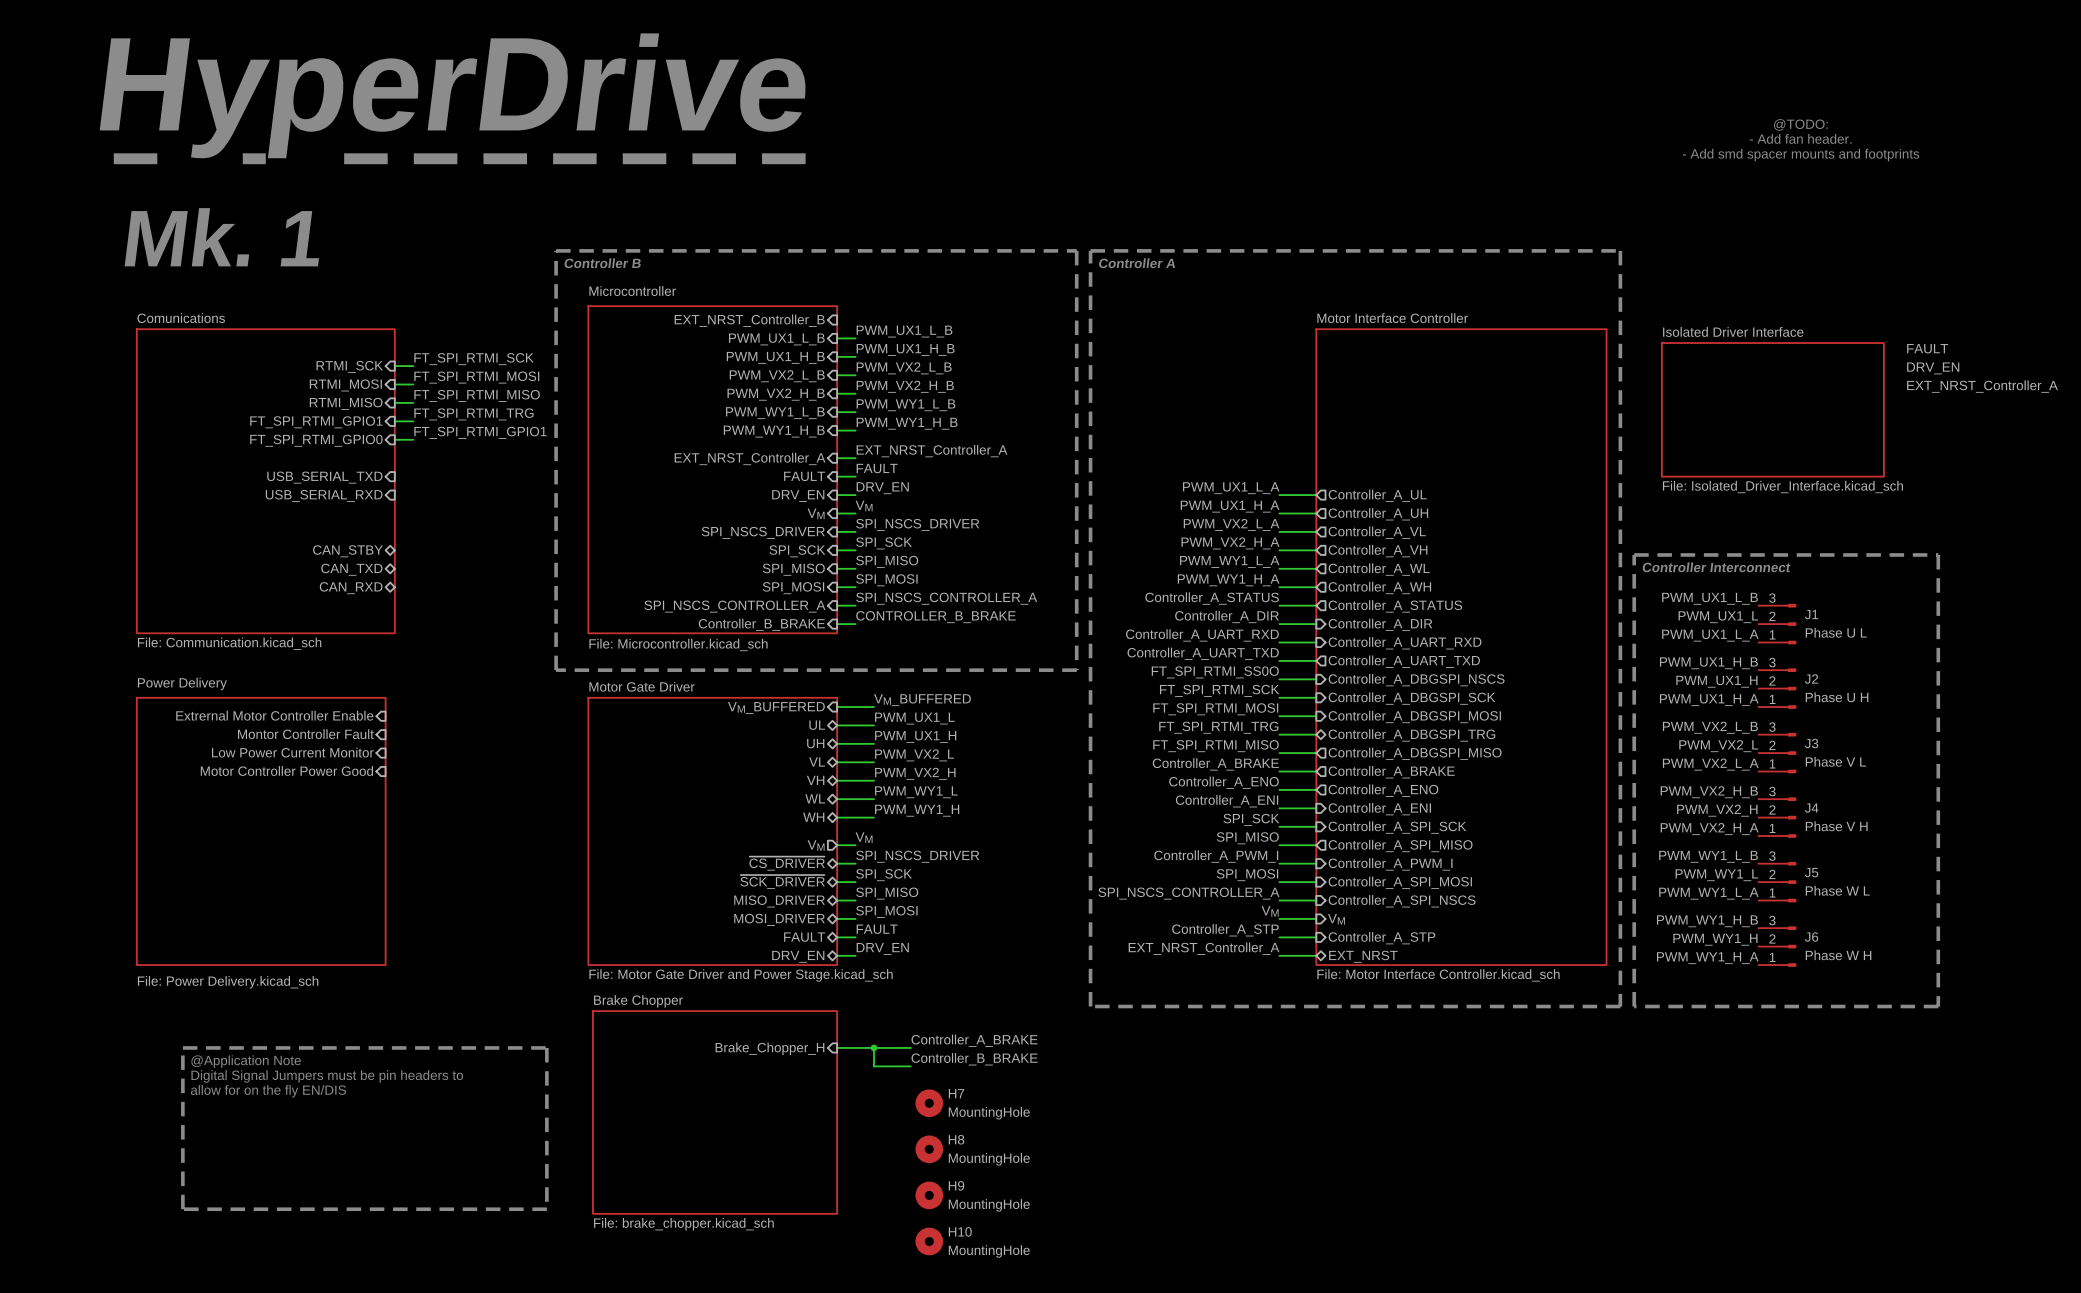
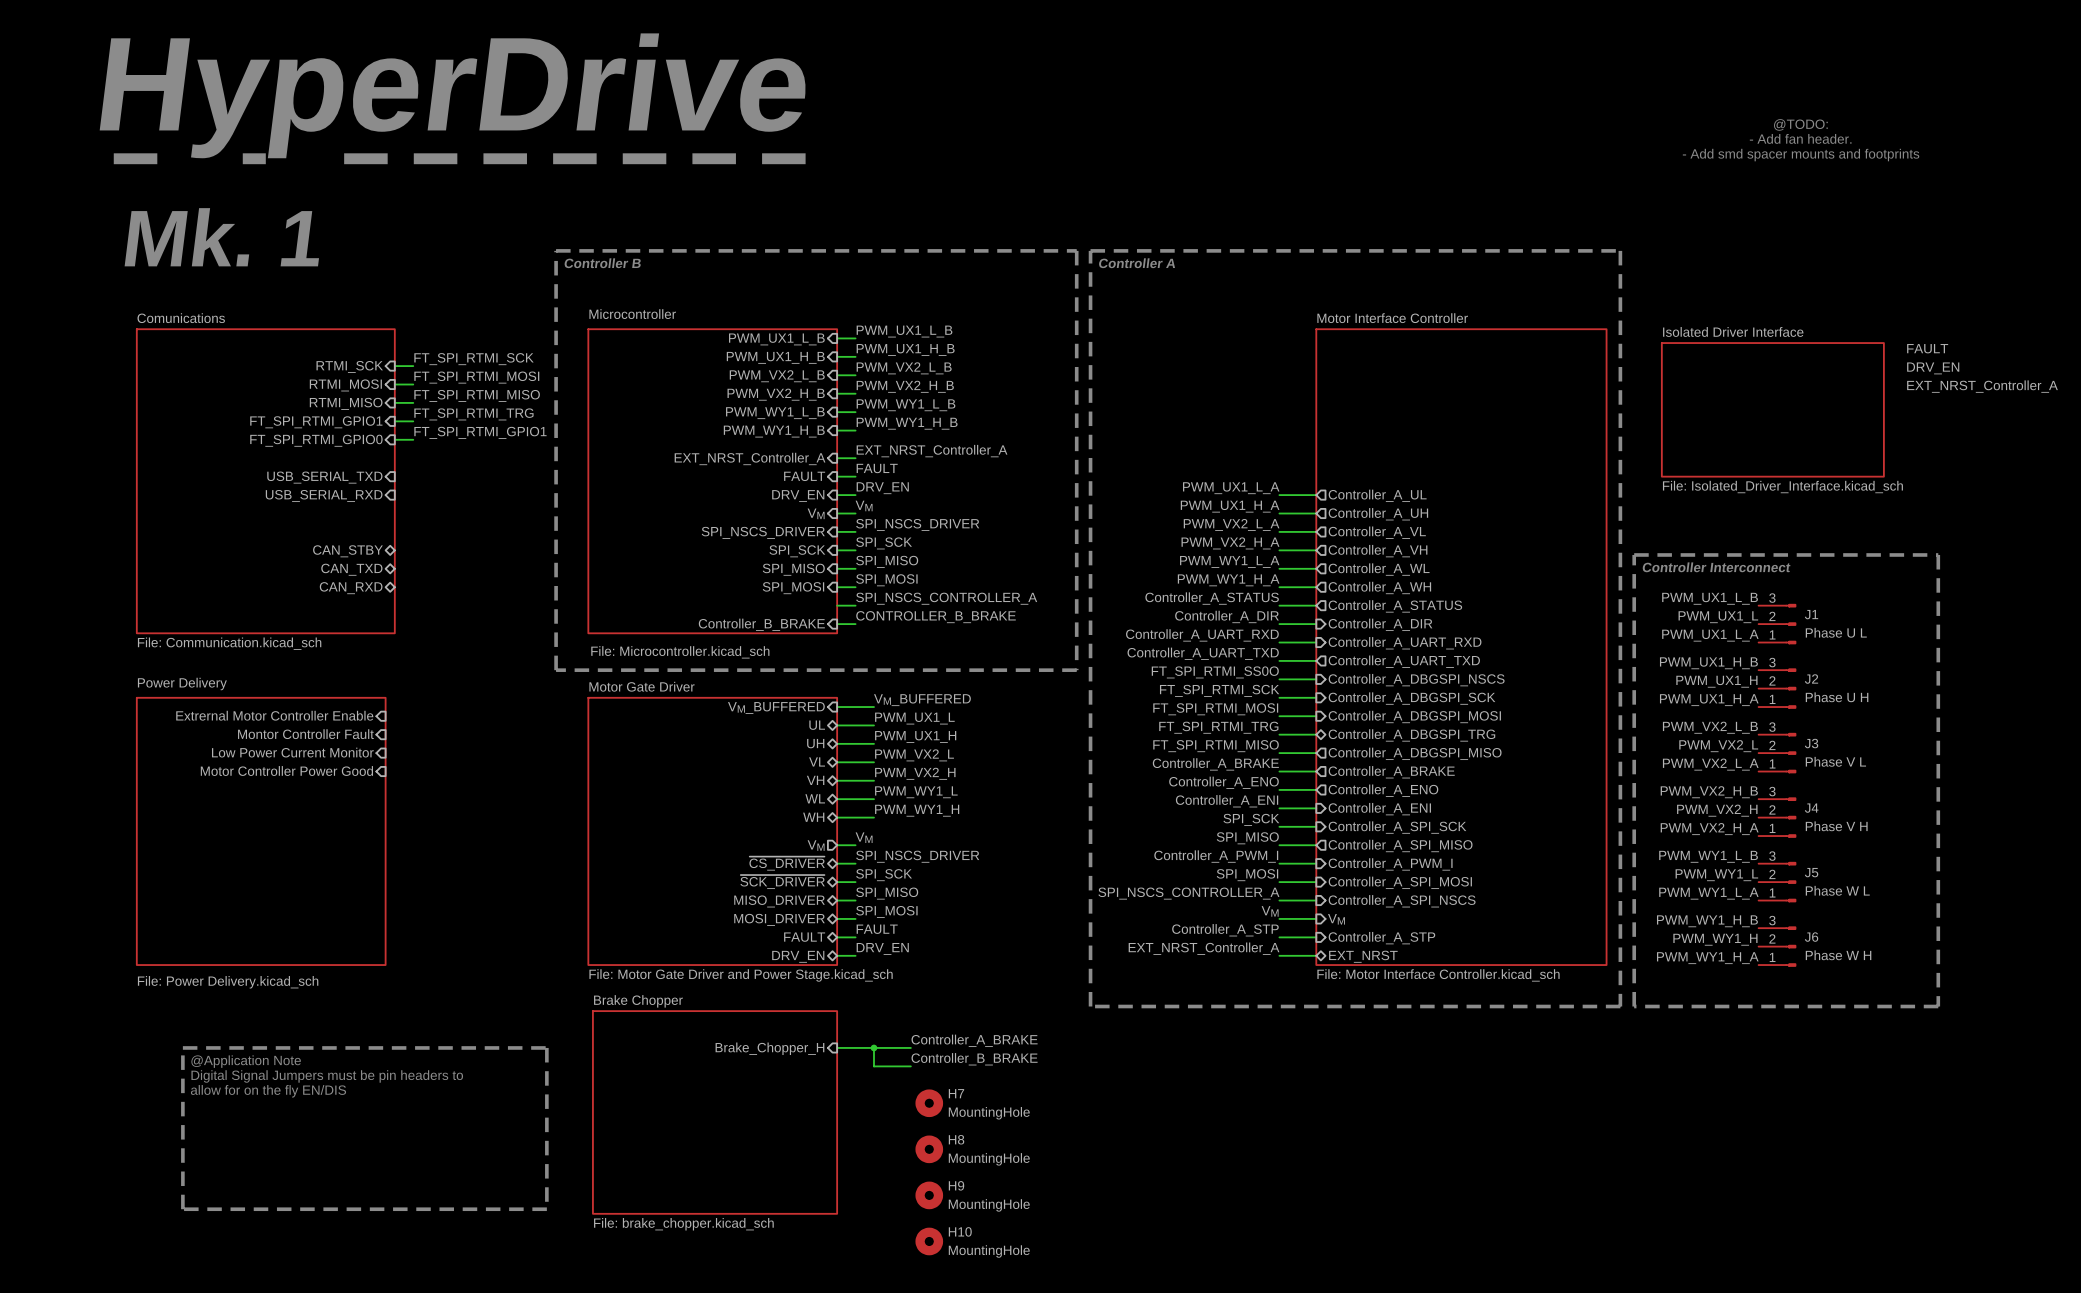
sheet pin: EXT_NRST_Controller_B (749, 320) -> none
sheet Microcontroller: File: Microcontroller.kicad_sch (712, 469) -> none
sheet Microcontroller: none -> File: Microcontroller.kicad_sch (712, 481)
sheet pin: SPI_NSCS_CONTROLLER_A (734, 606) -> none

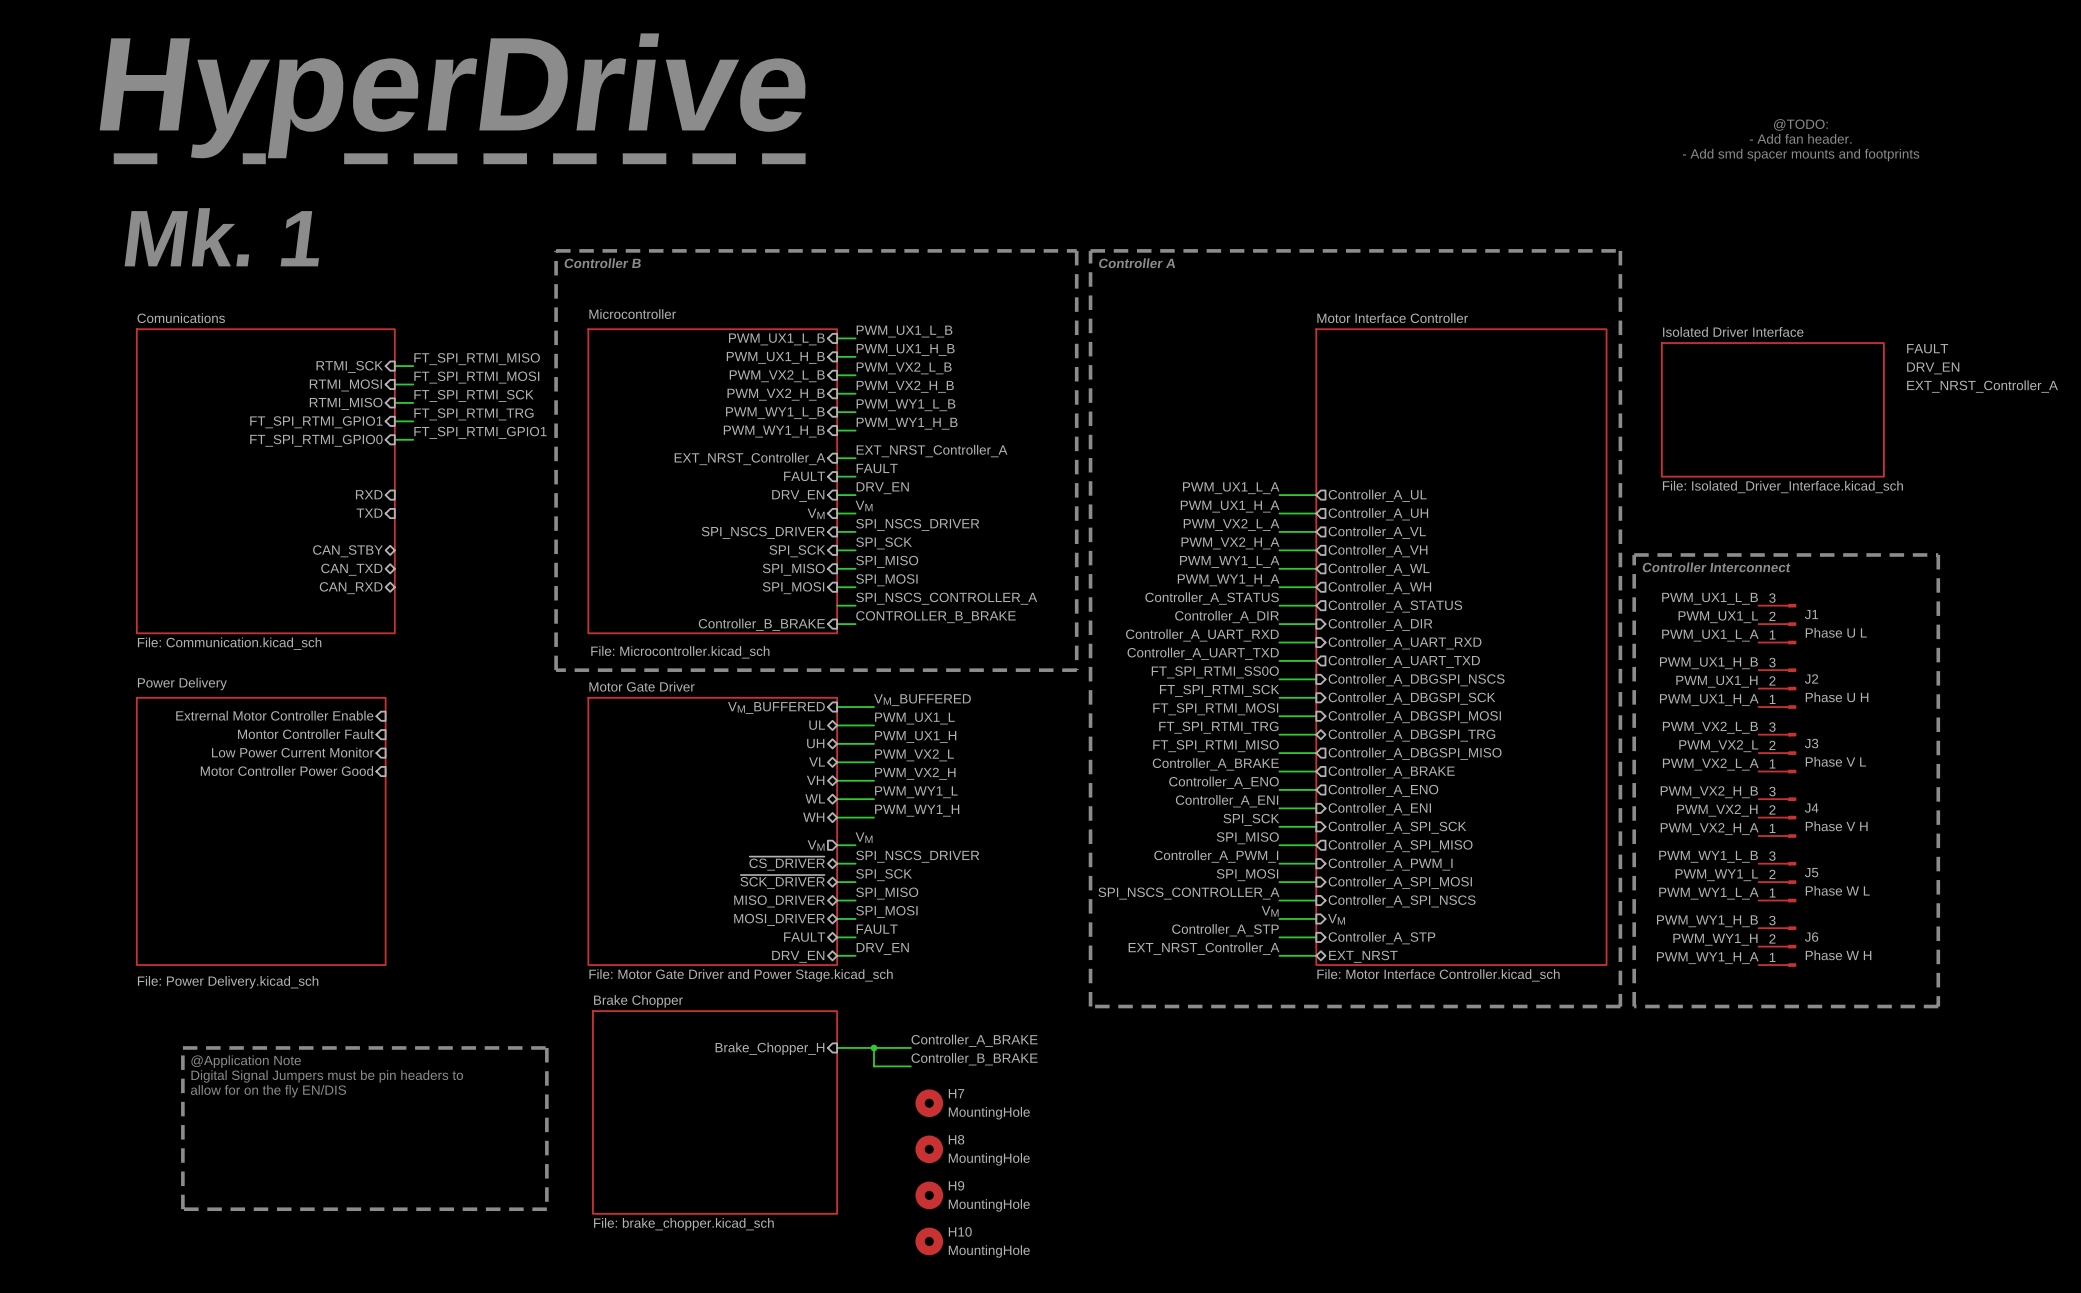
label: FT_SPI_RTMI_SCK (474, 359) -> FT_SPI_RTMI_MISO (477, 359)
label: FT_SPI_RTMI_MISO (477, 395) -> FT_SPI_RTMI_SCK (474, 395)
sheet pin: USB_SERIAL_TXD (324, 477) -> none
sheet pin: USB_SERIAL_RXD (324, 496) -> RXD (369, 494)
sheet pin: none -> TXD (369, 513)

